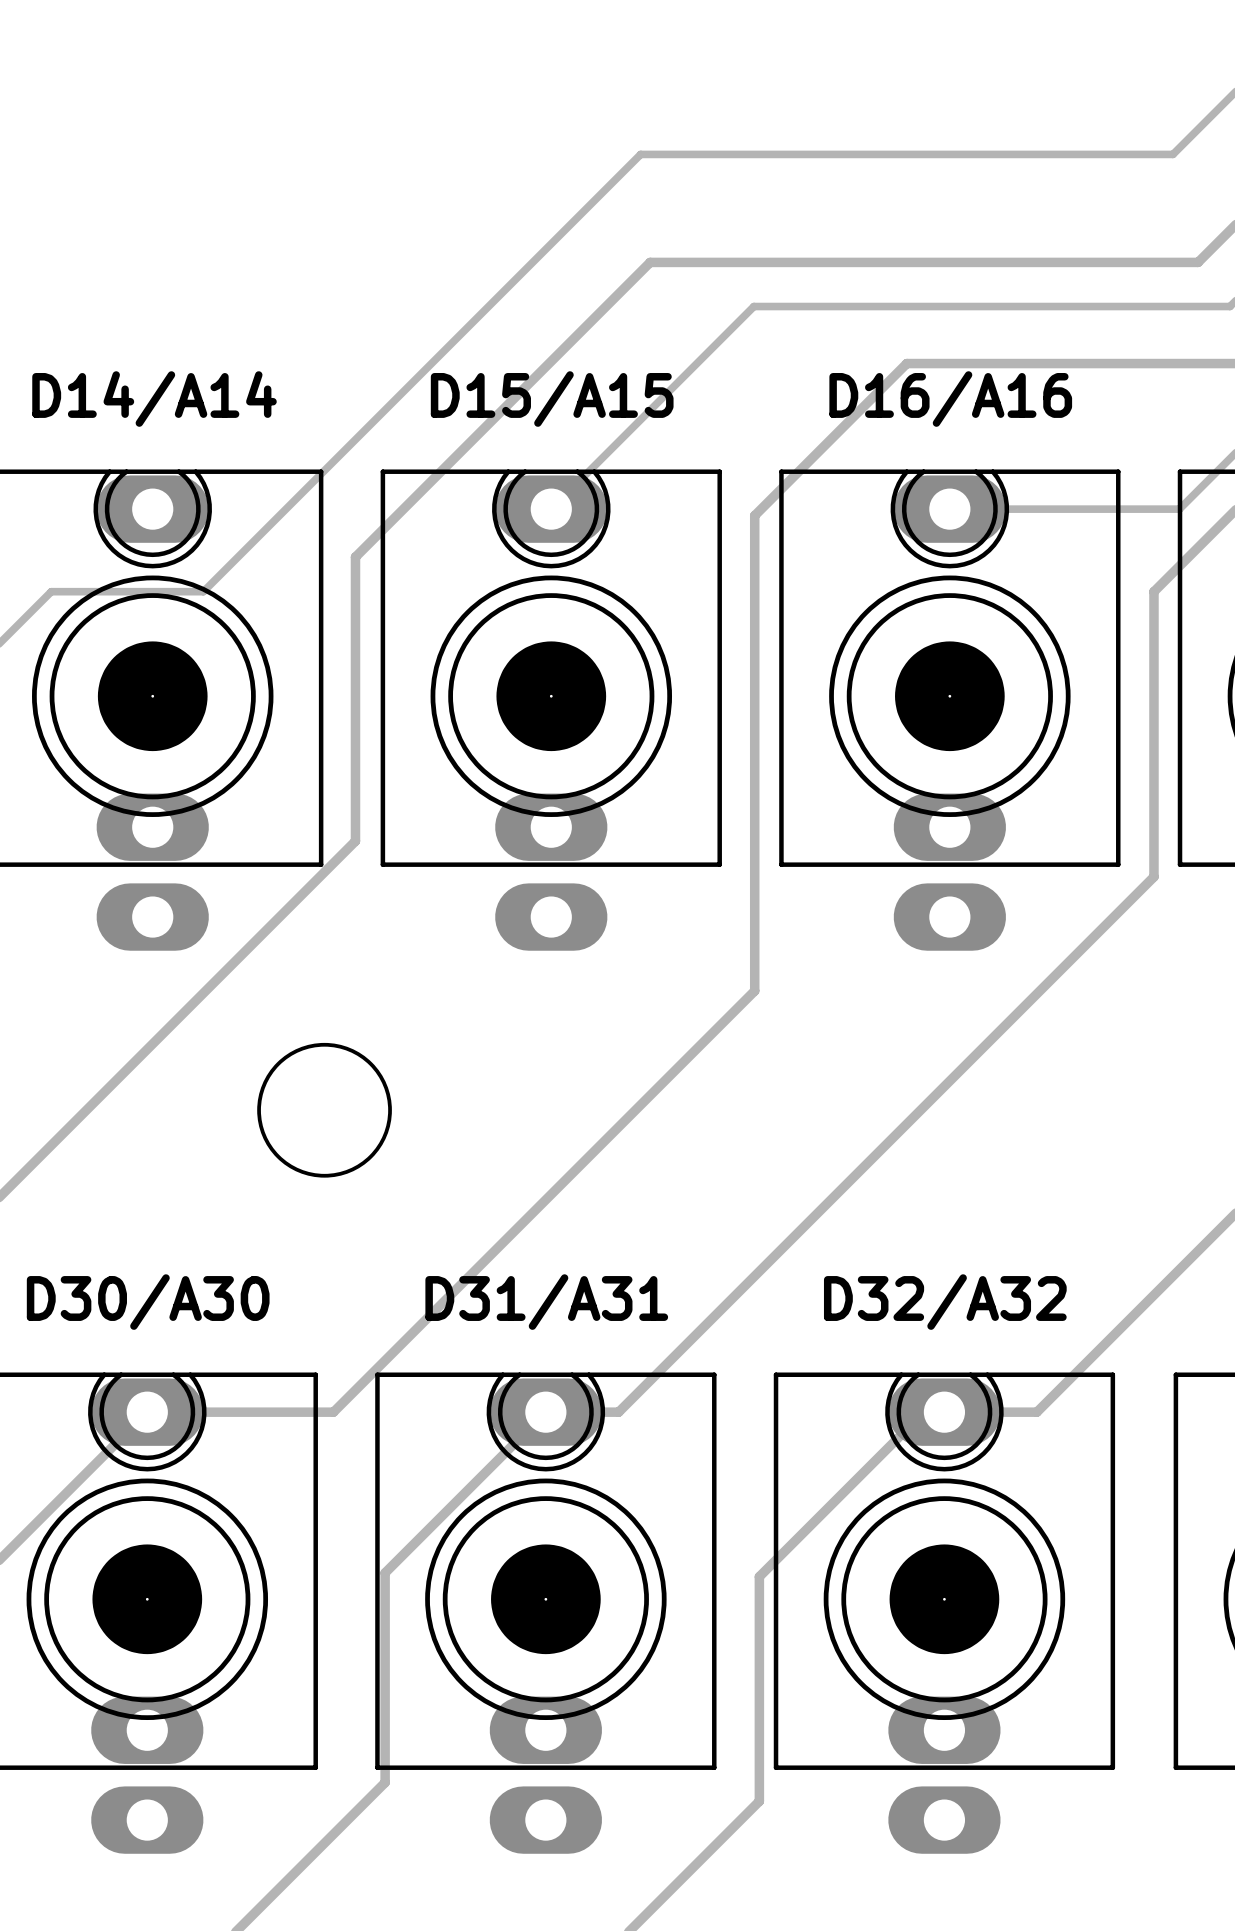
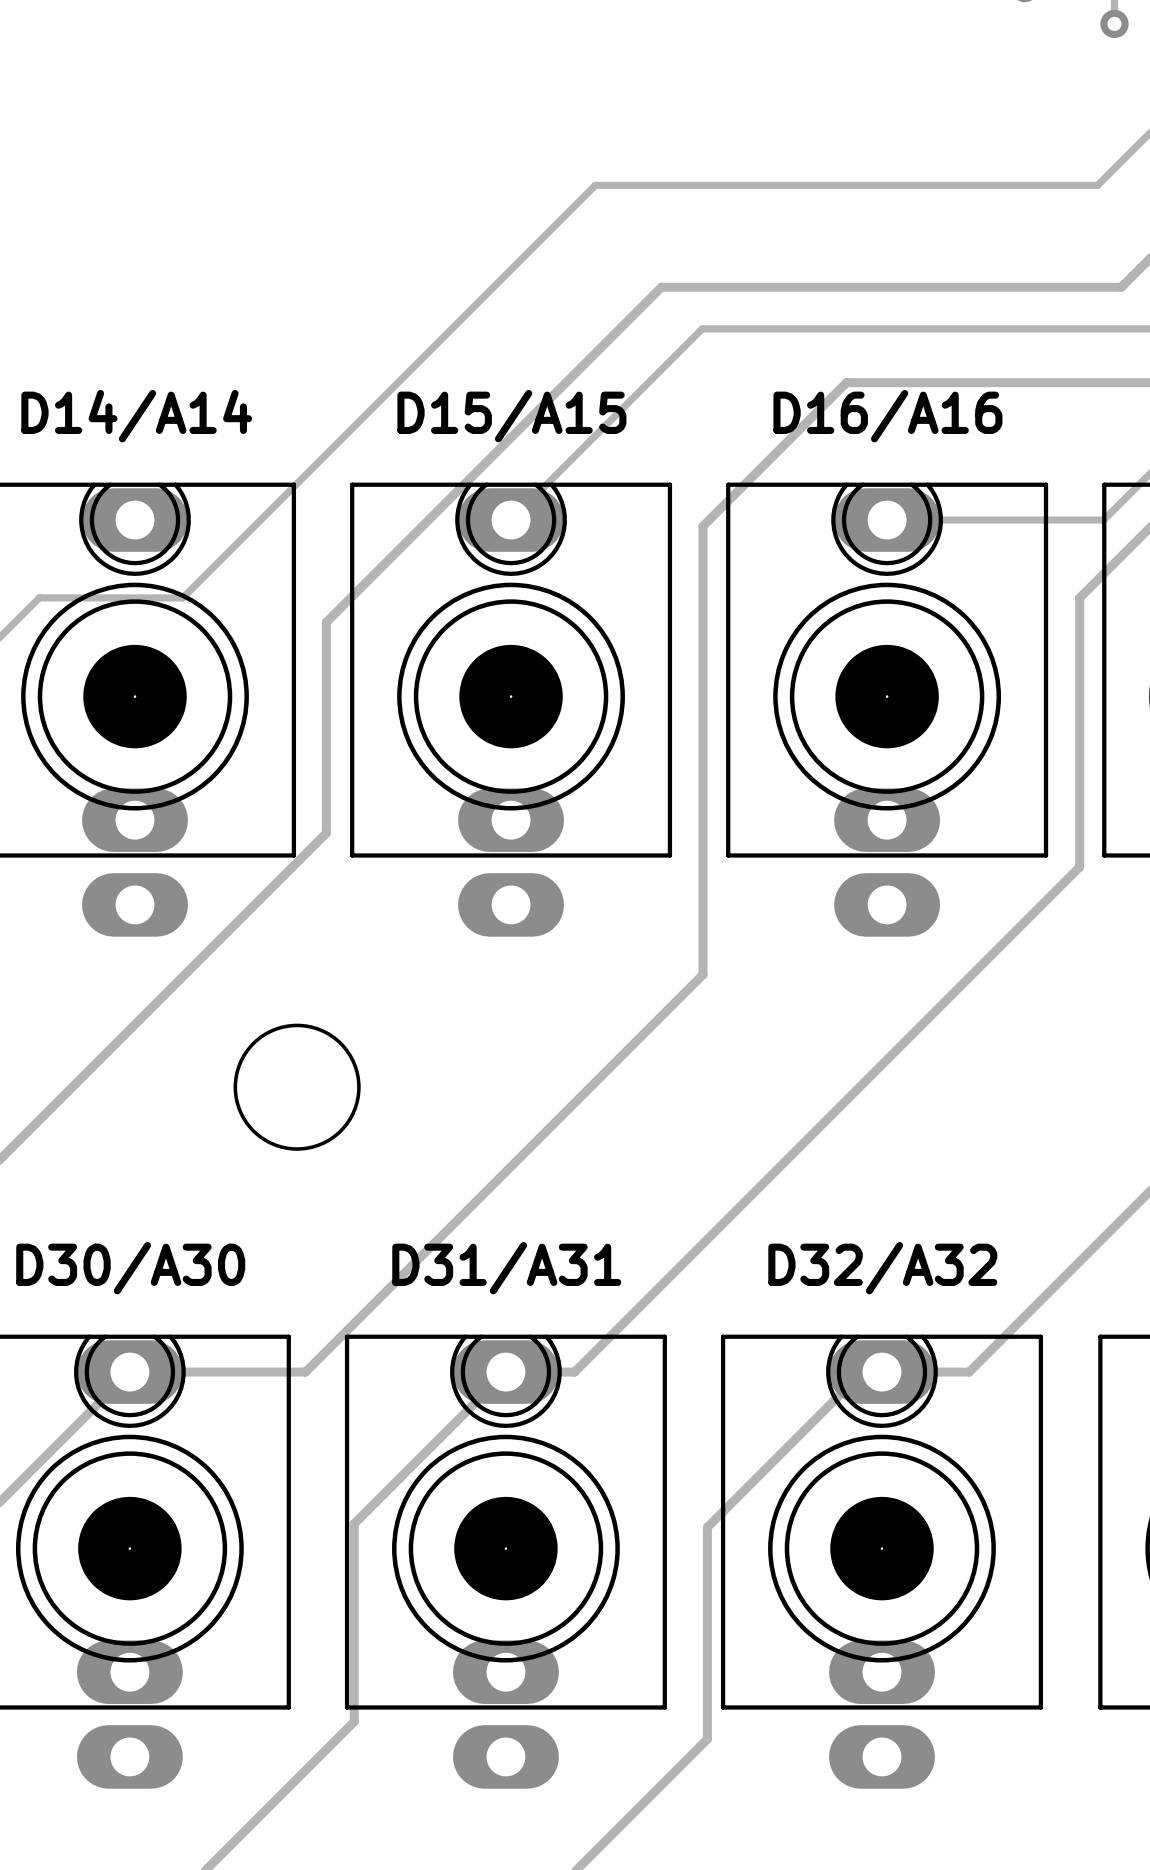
track: (710, 262) (650, 262) (355, 557) (355, 617) -> (661, 287) (326, 622)

